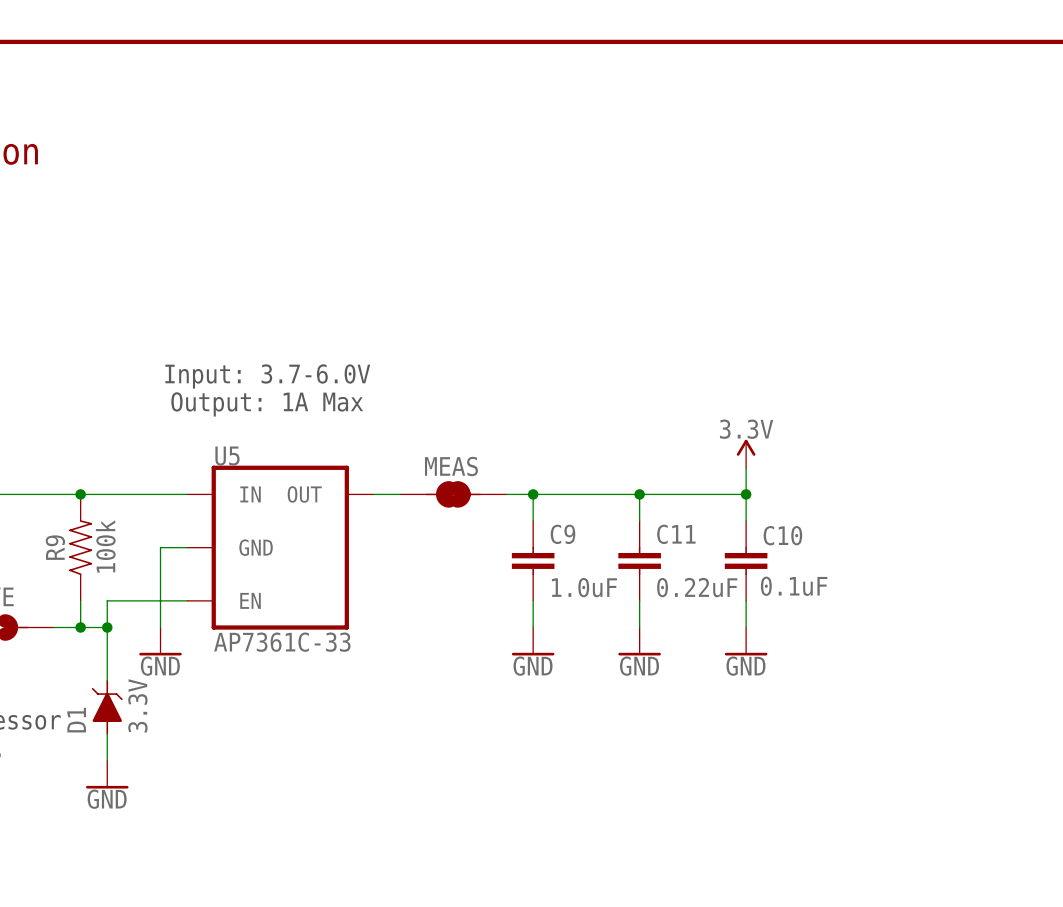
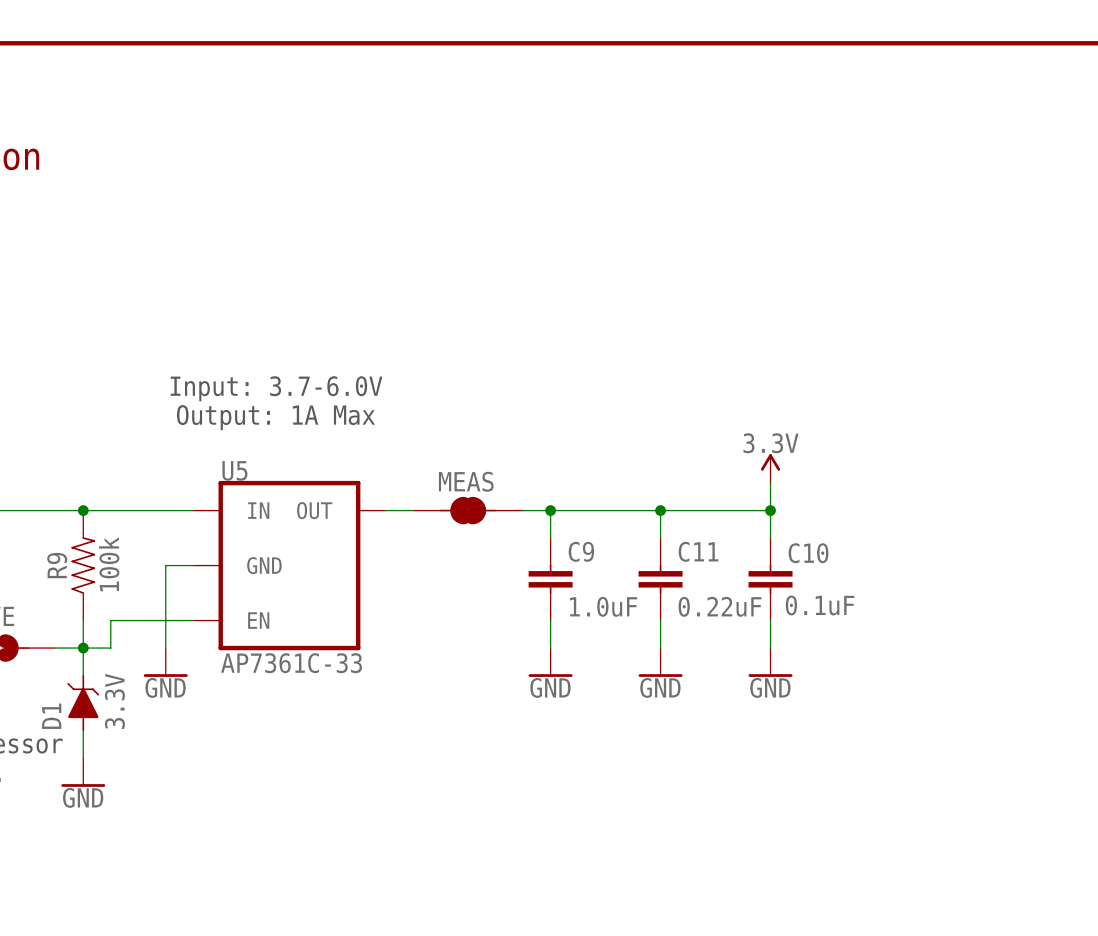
wire: none -> (83, 648) (83, 675)
wire: (107, 627) (107, 680) -> none
junction: (107, 627) -> none
D1 position: (107, 707) -> (83, 703)
wire: (107, 733) (107, 760) -> (83, 730) (83, 757)
power symbol position: GND (107, 774) -> GND (83, 772)

